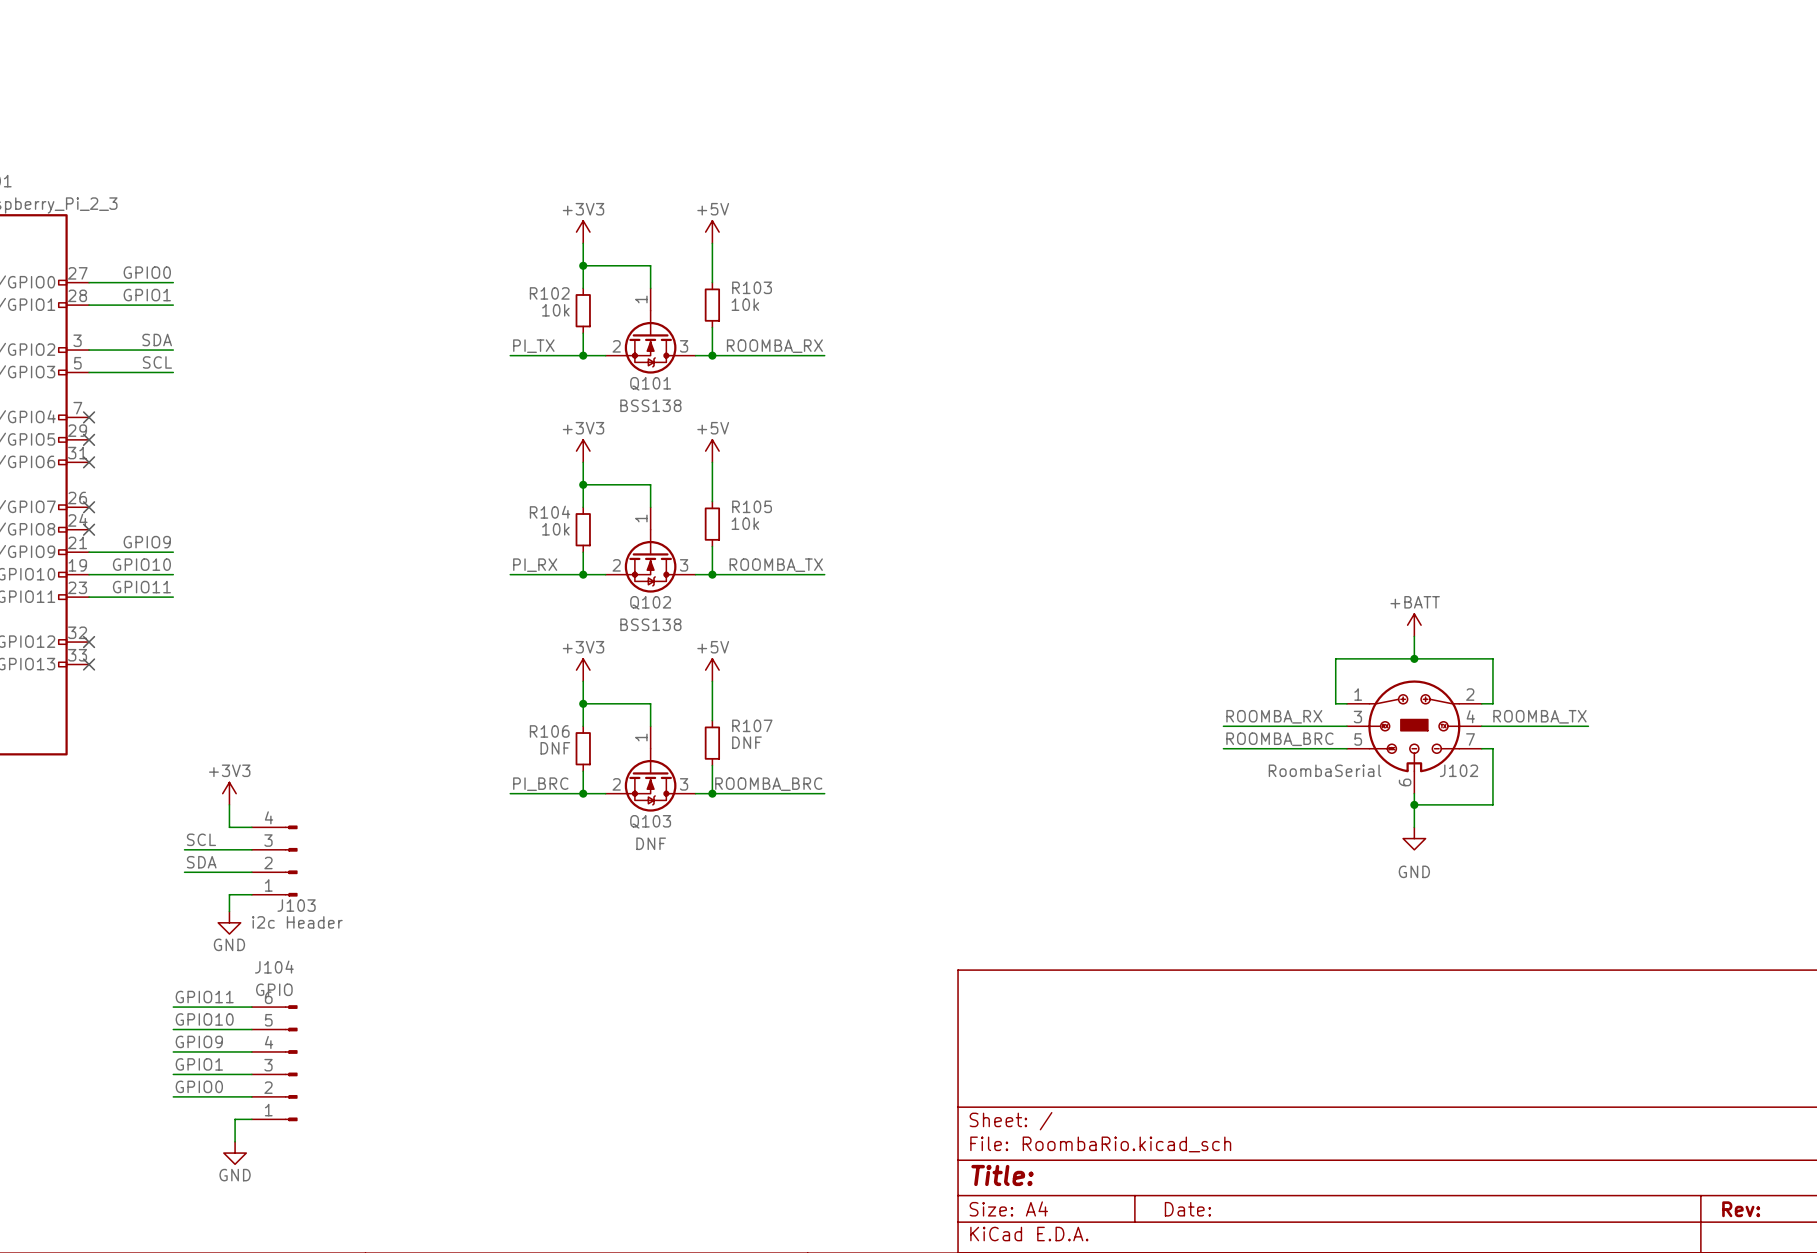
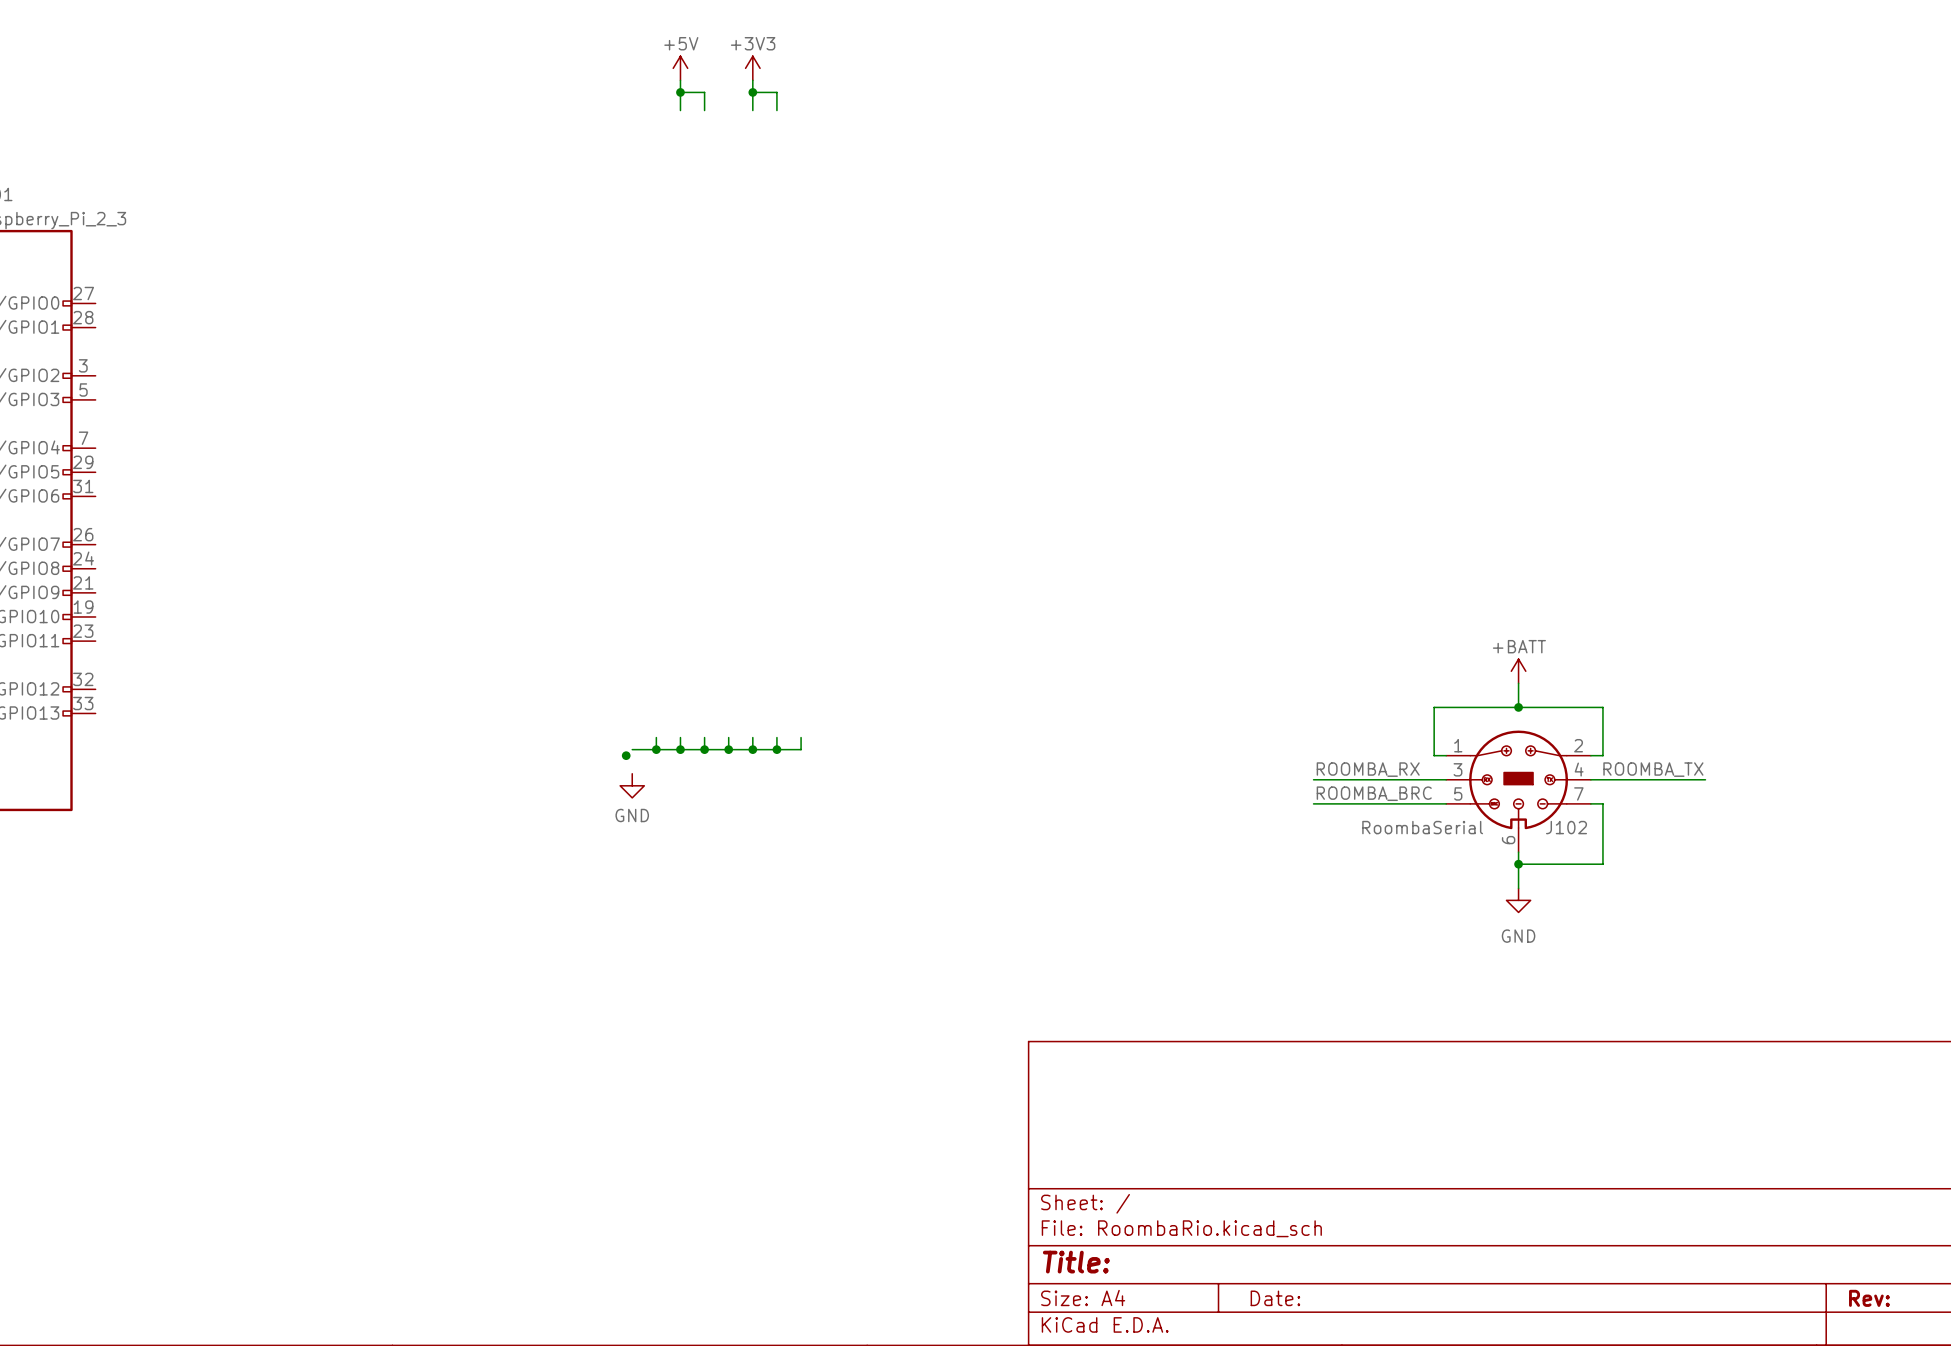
power symbol: none -> +3V3 (752, 68)
wire: none -> (680, 80) (680, 110)
wire: none -> (752, 80) (752, 110)
wire: none -> (680, 92) (704, 92) (704, 110)
junction: none -> (680, 92)
wire: none -> (752, 92) (776, 92) (776, 110)
junction: none -> (752, 92)
power symbol: +3V3 (583, 232) -> none
power symbol position: +5V (712, 232) -> +5V (680, 68)
wire: (583, 243) (583, 288) -> none
wire: (712, 243) (712, 282) -> none
wire: (583, 265) (650, 265) (650, 288) -> none
junction: (583, 265) -> none
label: GPIO0 (147, 272) -> none
wire: (89, 282) (173, 282) -> none
label: GPIO1 (147, 295) -> none
wire: (89, 305) (173, 305) -> none
R103: 10k (712, 305) -> none
R102: 10k (583, 310) -> none
wire: (712, 327) (712, 355) -> none
Q101: BSS138 (650, 330) -> none
wire: (583, 333) (583, 355) -> none
label: SDA (157, 340) -> none
label: PI_TX (533, 346) -> none
label: ROOMBA_RX (774, 346) -> none
wire: (89, 350) (173, 350) -> none
wire: (510, 355) (605, 355) -> none
junction: (583, 355) -> none
wire: (695, 355) (824, 355) -> none
junction: (712, 355) -> none
label: SCL (157, 362) -> none
wire: (89, 372) (173, 372) -> none
no-connect mark: (89, 417) -> none
no-connect mark: (89, 439) -> none
power symbol: +3V3 (583, 451) -> none
power symbol: +5V (712, 451) -> none
no-connect mark: (89, 462) -> none
wire: (583, 462) (583, 507) -> none
wire: (712, 462) (712, 501) -> none
wire: (583, 484) (650, 484) (650, 507) -> none
junction: (583, 484) -> none
no-connect mark: (89, 507) -> none
R105: 10k (712, 524) -> none
no-connect mark: (89, 529) -> none
R104: 10k (583, 529) -> none
label: GPIO9 (147, 542) -> none
wire: (712, 546) (712, 574) -> none
Q102: BSS138 (650, 549) -> none
wire: (89, 552) (173, 552) -> none
wire: (583, 552) (583, 574) -> none
label: GPIO10 (141, 564) -> none
label: PI_RX (535, 565) -> none
label: ROOMBA_TX (776, 565) -> none
wire: (89, 574) (173, 574) -> none
wire: (510, 574) (605, 574) -> none
junction: (583, 574) -> none
wire: (695, 574) (824, 574) -> none
junction: (712, 574) -> none
label: GPIO11 (141, 587) -> none
wire: (89, 597) (173, 597) -> none
no-connect mark: (89, 642) -> none
no-connect mark: (89, 664) -> none
power symbol: +3V3 (583, 670) -> none
power symbol: +5V (712, 670) -> none
wire: (583, 681) (583, 726) -> none
wire: (712, 681) (712, 720) -> none
wire: none -> (656, 737) (656, 749)
wire: none -> (680, 737) (680, 749)
wire: none -> (704, 737) (704, 749)
wire: none -> (728, 737) (728, 749)
wire: none -> (752, 737) (752, 749)
wire: none -> (776, 737) (776, 749)
wire: none -> (801, 737) (801, 749) (632, 749)
junction: none -> (656, 749)
junction: none -> (680, 749)
junction: none -> (704, 749)
junction: none -> (728, 749)
junction: none -> (752, 749)
junction: none -> (776, 749)
wire: (583, 703) (650, 703) (650, 726) -> none
power symbol: none -> GND (632, 785)
R107: DNF (712, 743) -> none
R106: DNF (583, 748) -> none
wire: (712, 765) (712, 793) -> none
Q103: DNF (650, 768) -> none
wire: (583, 771) (583, 793) -> none
label: PI_BRC (540, 784) -> none
label: ROOMBA_BRC (768, 784) -> none
power symbol: +3V3 (229, 793) -> none
wire: (510, 793) (605, 793) -> none
junction: (583, 793) -> none
wire: (695, 793) (824, 793) -> none
junction: (712, 793) -> none
wire: (229, 804) (229, 827) (251, 827) -> none
label: SCL (201, 839) -> none
wire: (184, 849) (251, 849) -> none
J103: i2c Header (274, 861) -> none
label: SDA (201, 862) -> none
wire: (184, 872) (251, 872) -> none
wire: (251, 894) (229, 894) (229, 911) -> none
power symbol: GND (229, 922) -> none
label: GPIO11 (204, 997) -> none
wire: (173, 1007) (251, 1007) -> none
label: GPIO10 (204, 1019) -> none
wire: (173, 1029) (251, 1029) -> none
label: GPIO9 (199, 1041) -> none
wire: (173, 1051) (251, 1051) -> none
J104: GPIO (274, 1063) -> none
label: GPIO1 (199, 1064) -> none
wire: (173, 1074) (251, 1074) -> none
label: GPIO0 (199, 1086) -> none
wire: (173, 1096) (251, 1096) -> none
wire: (251, 1119) (235, 1119) (235, 1141) -> none
power symbol: GND (235, 1153) -> none

